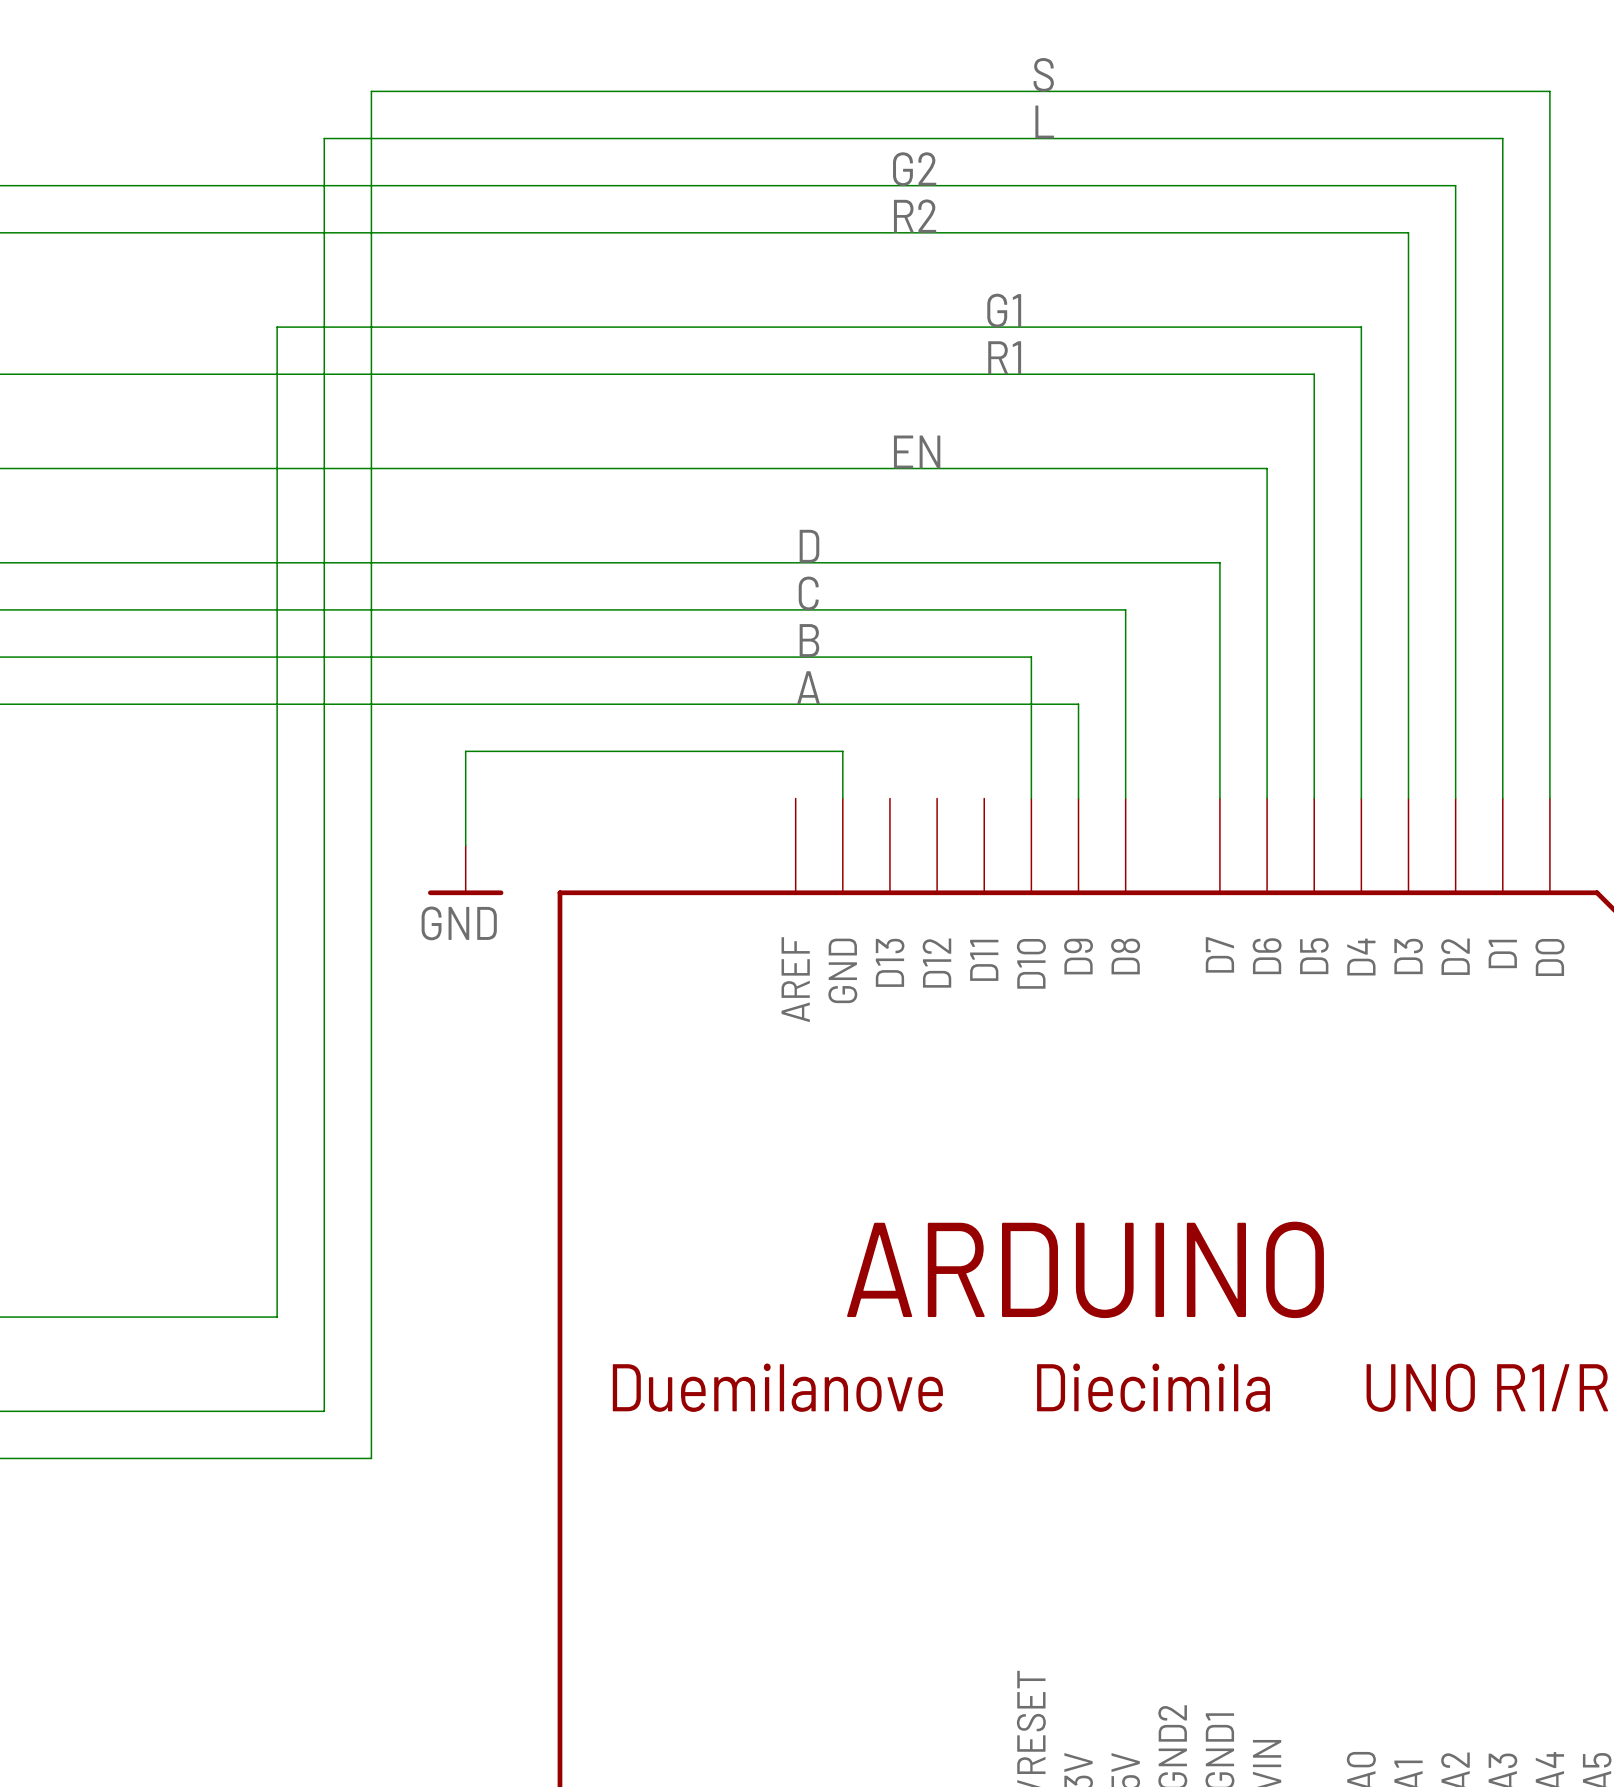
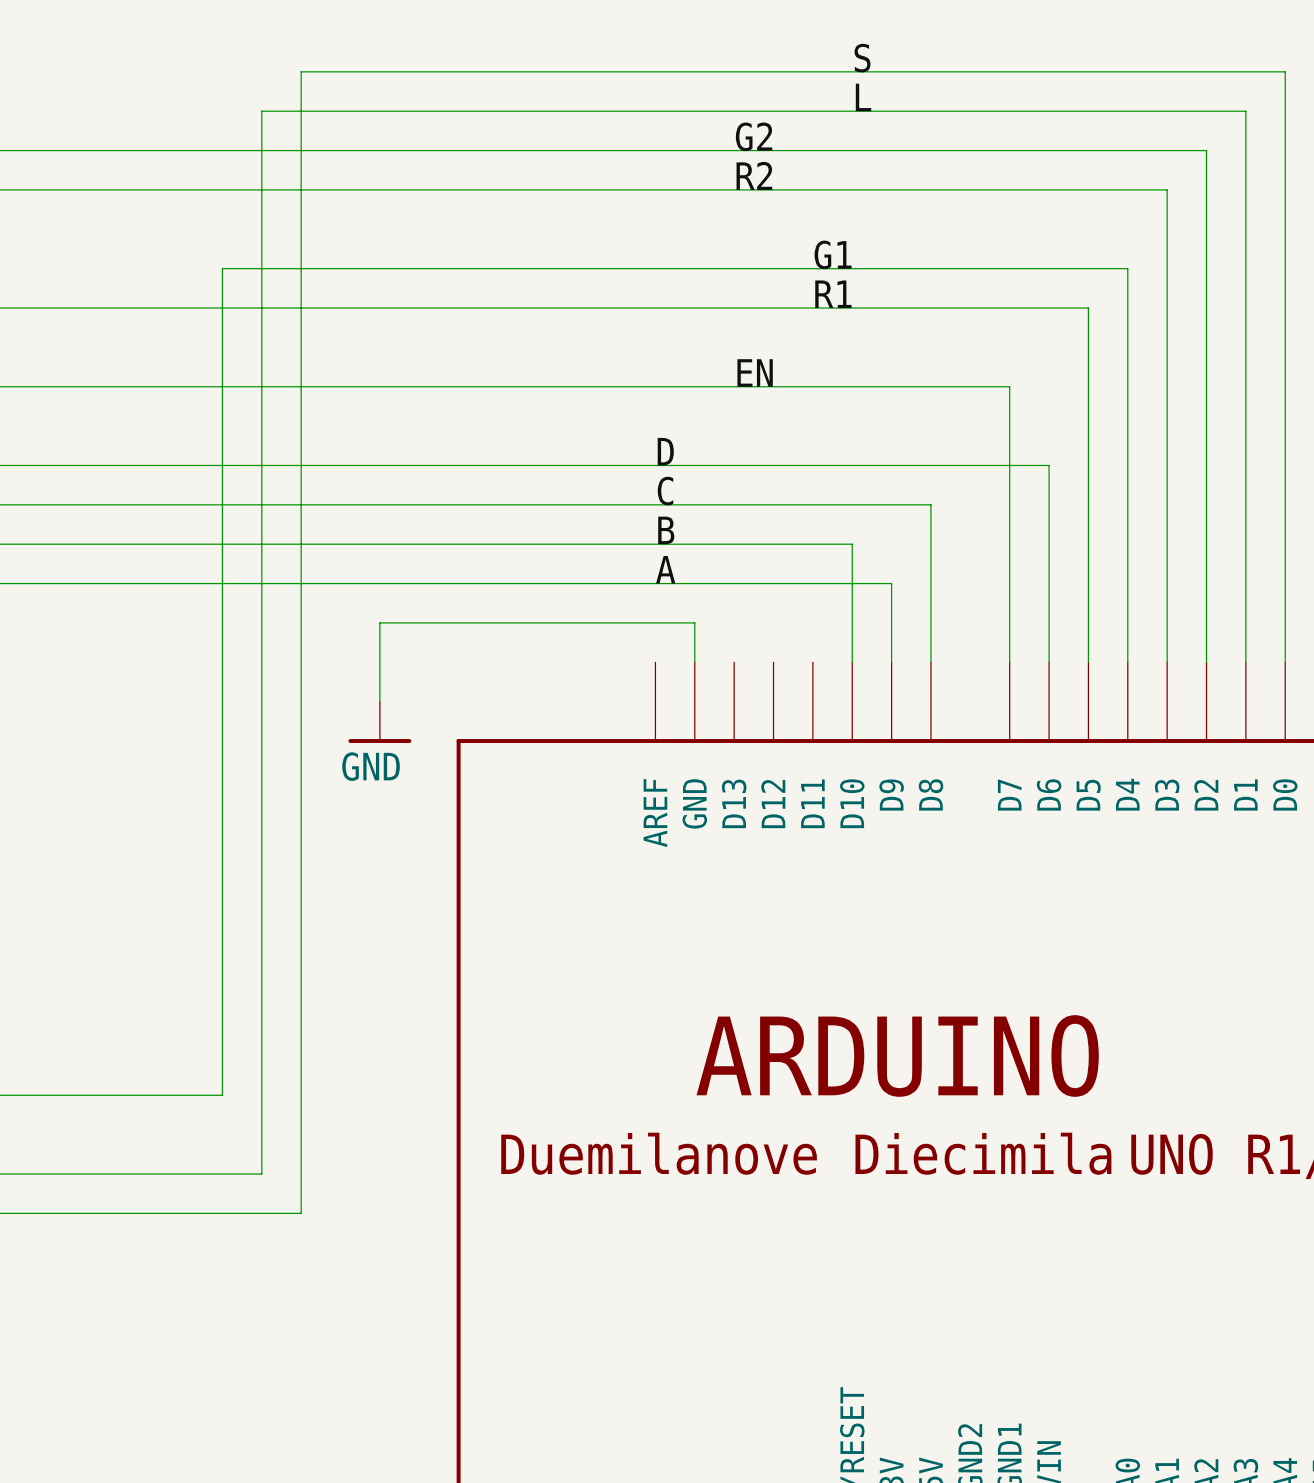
wire: (1219, 468) (1267, 468) (1267, 562) -> (1009, 386) (1009, 465) (1049, 465)

